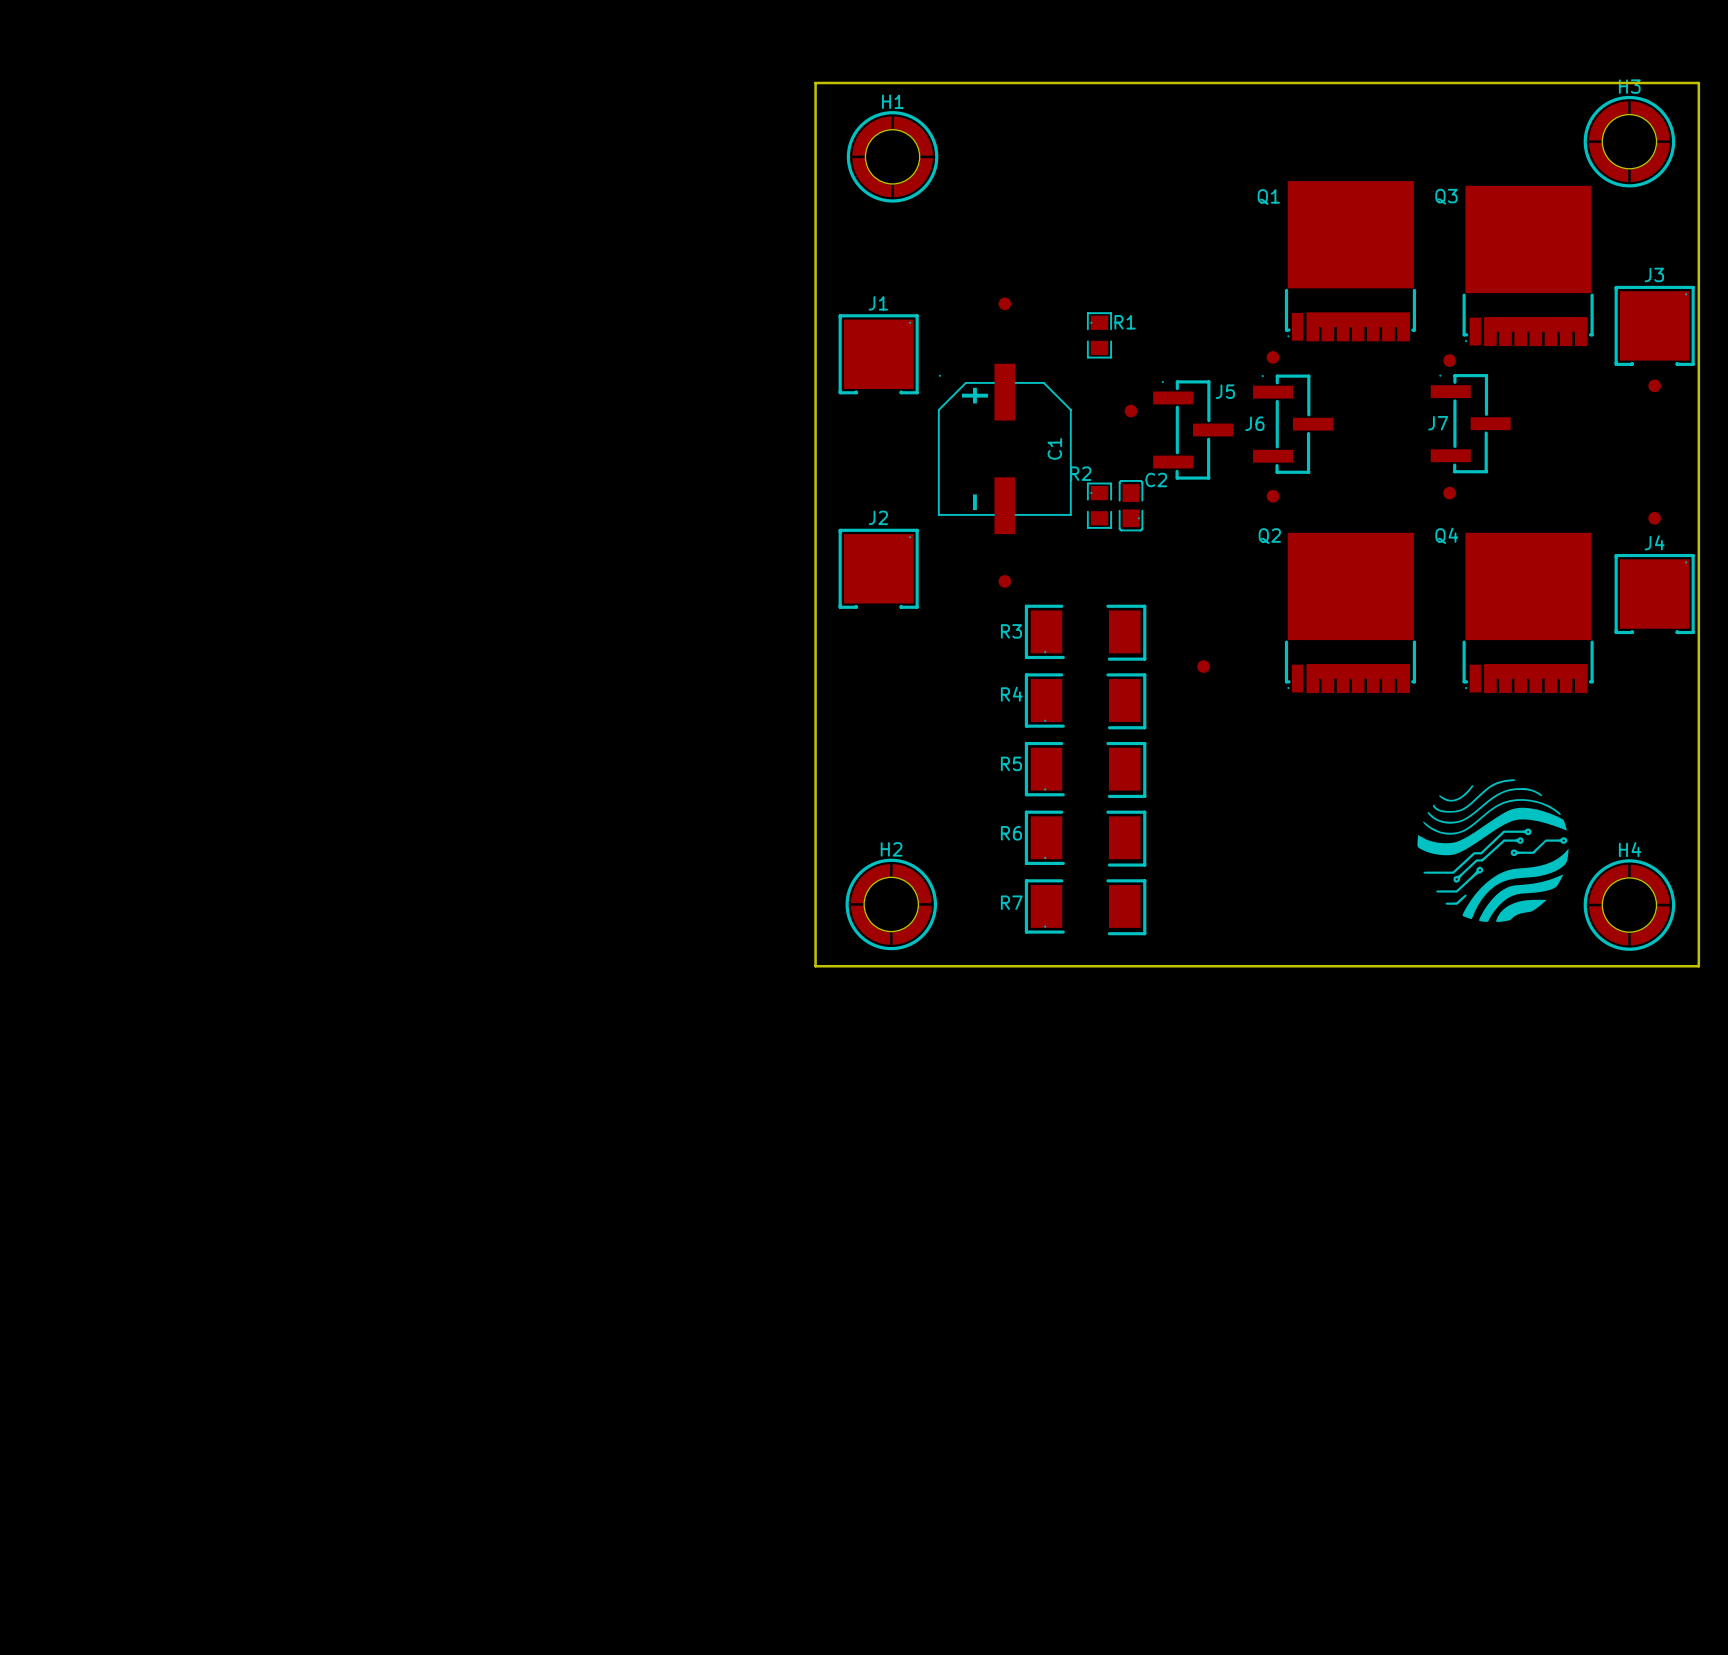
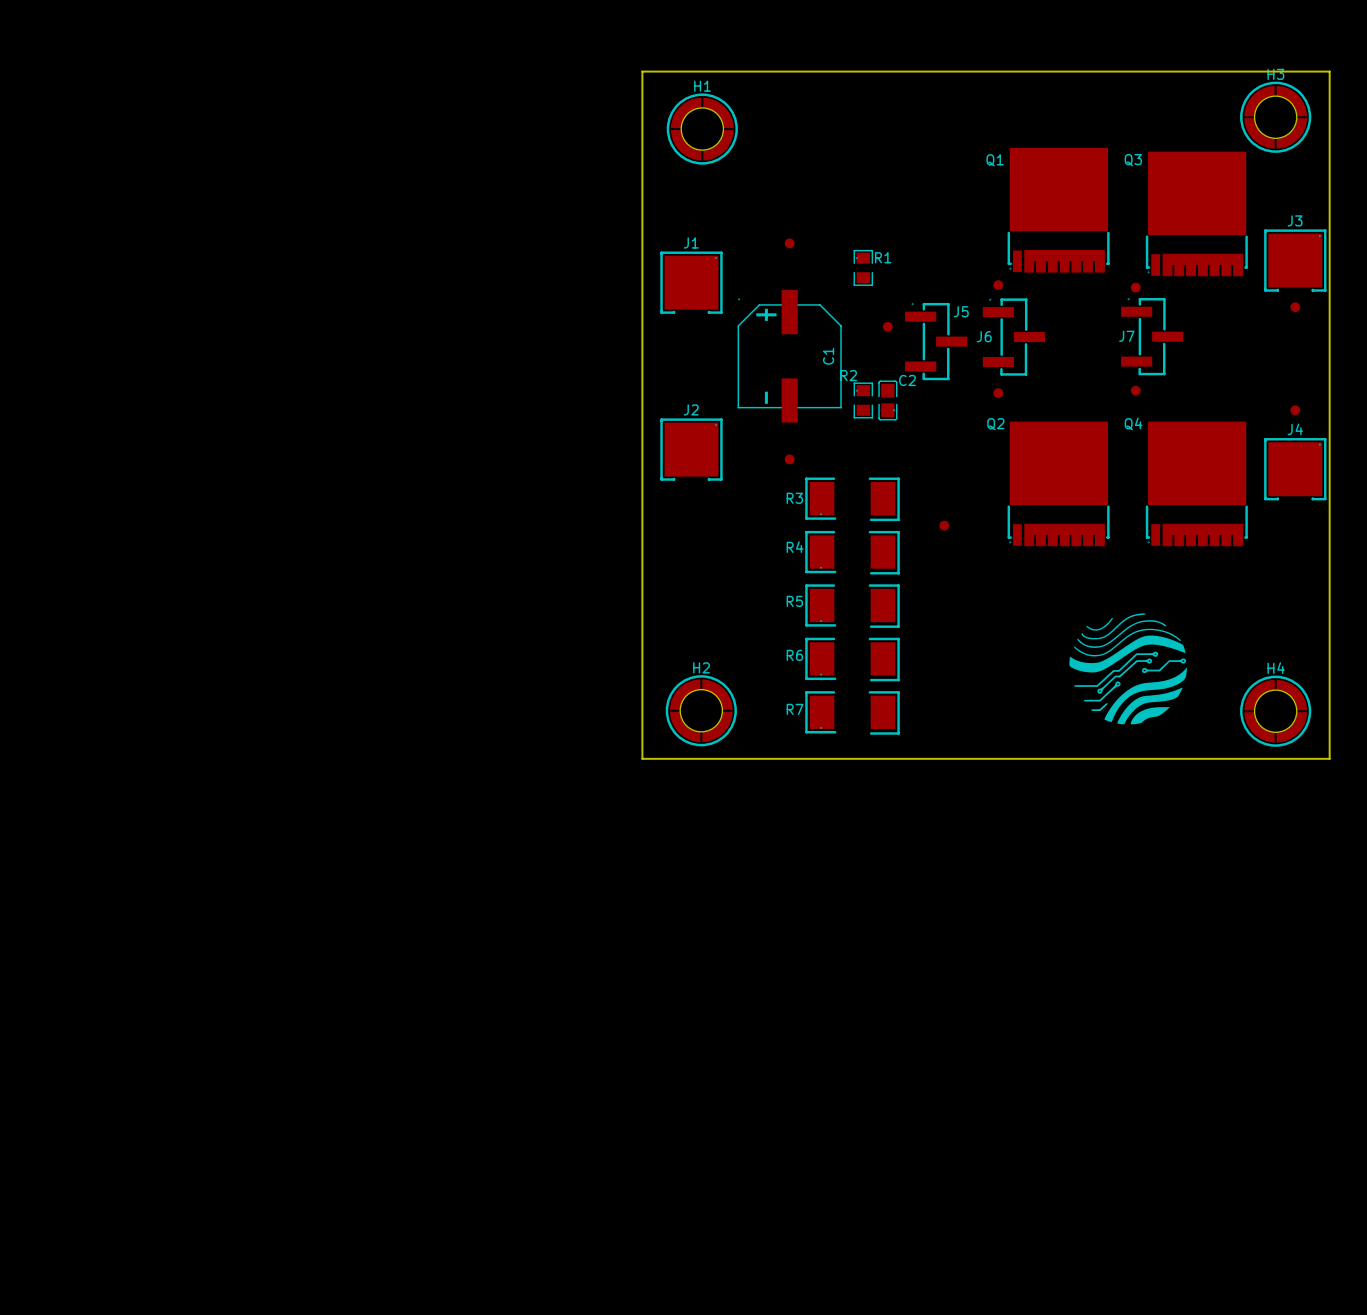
drawing position: (1493, 850) -> (1128, 668)

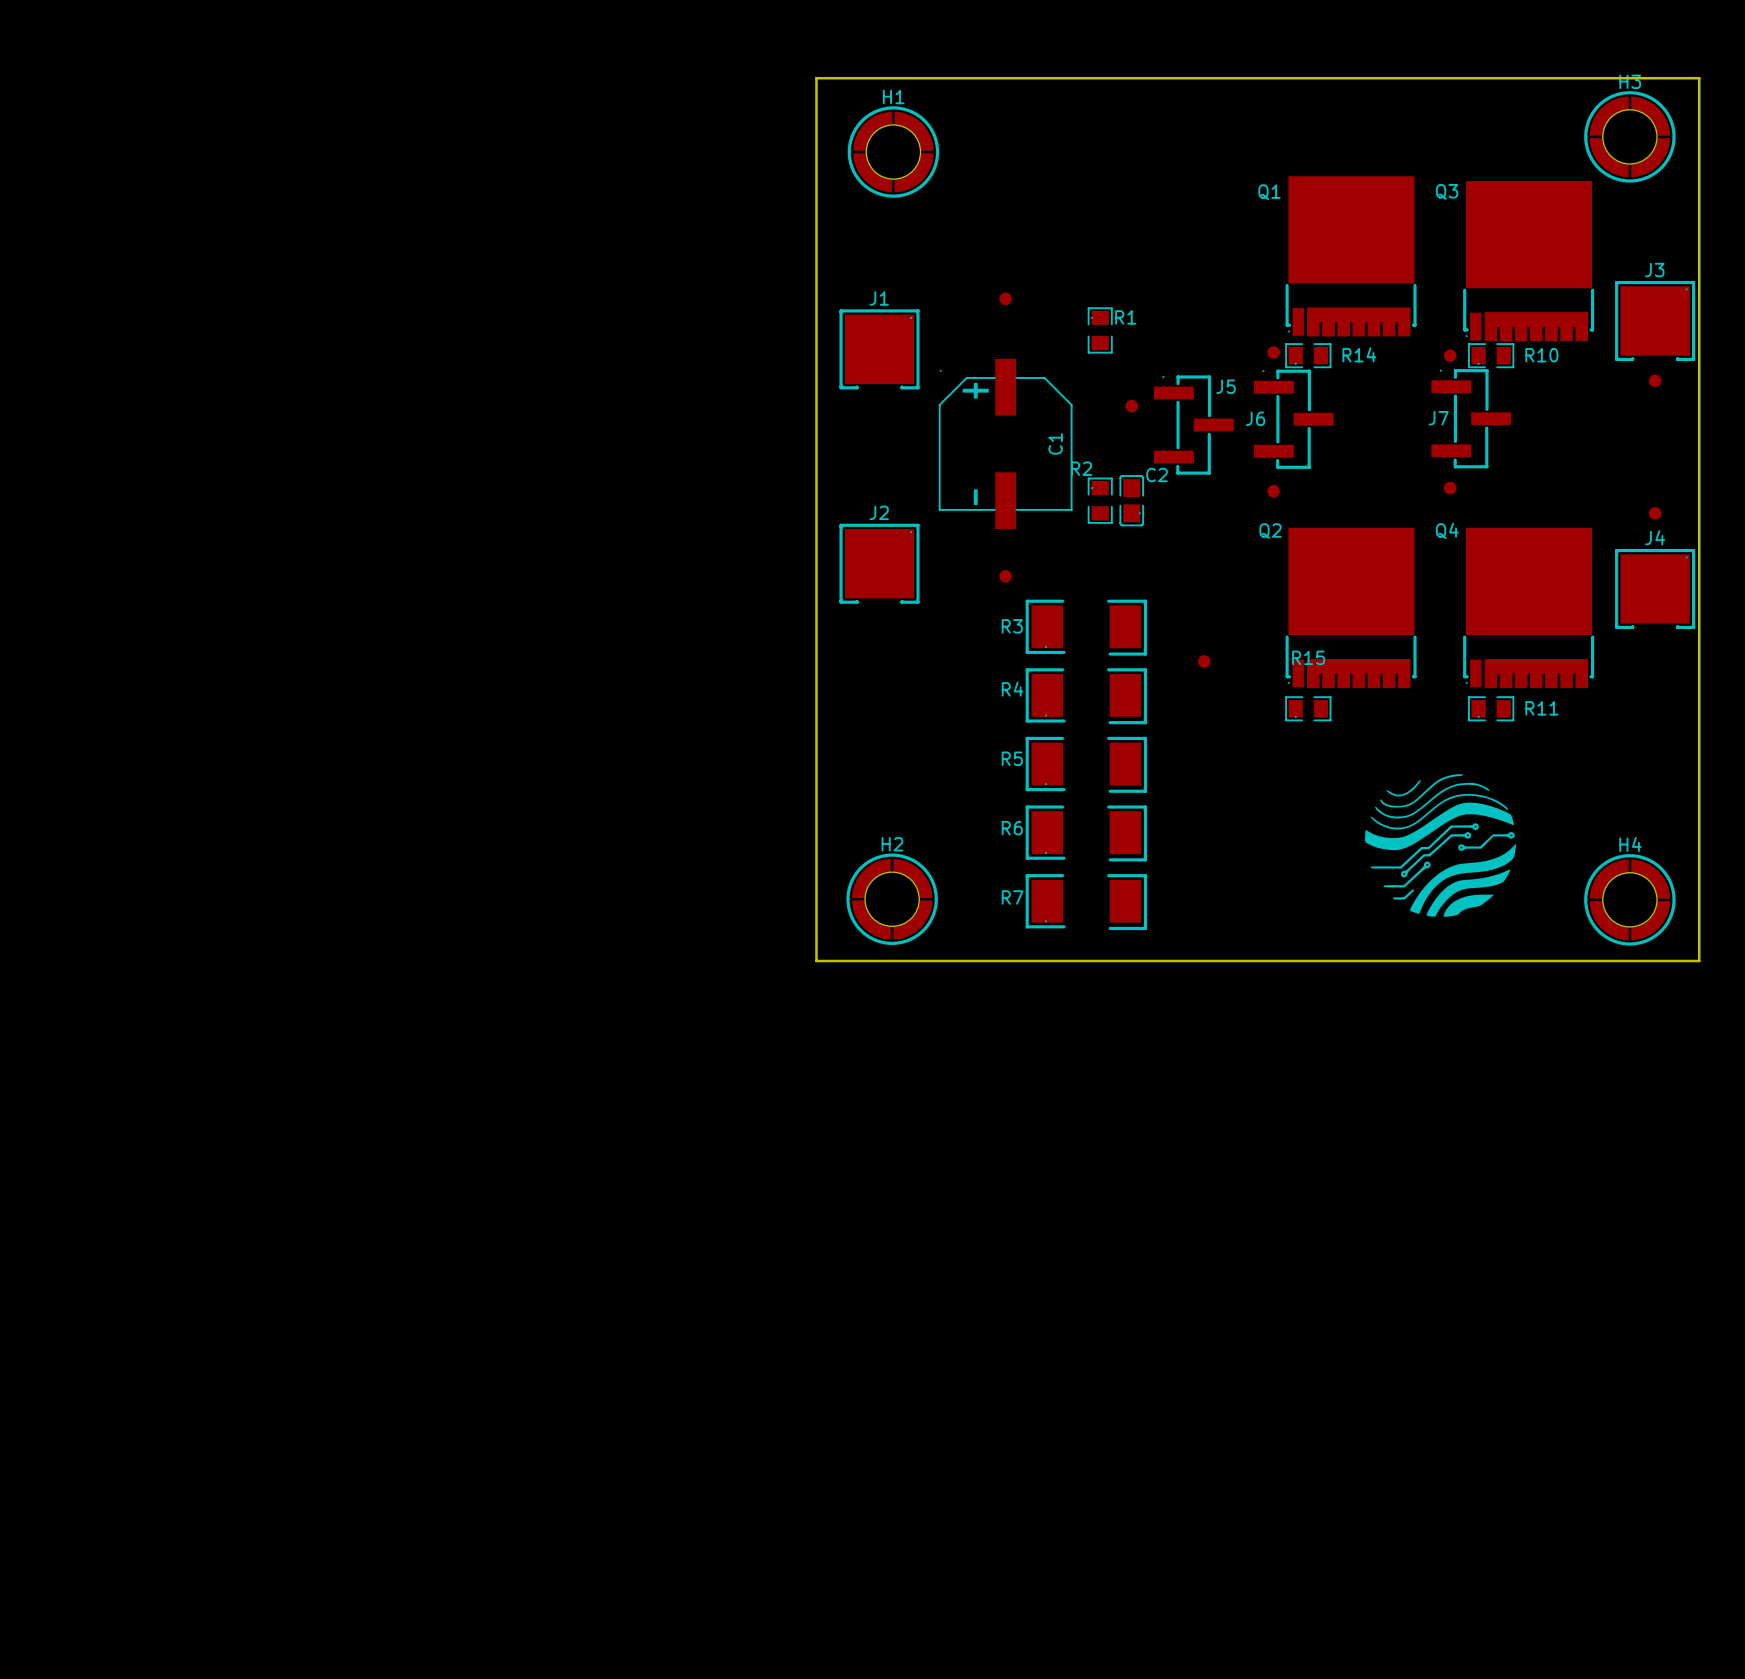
R14: none -> (1308, 355)
R10: none -> (1491, 355)
R15: none -> (1308, 708)
R11: none -> (1491, 708)

